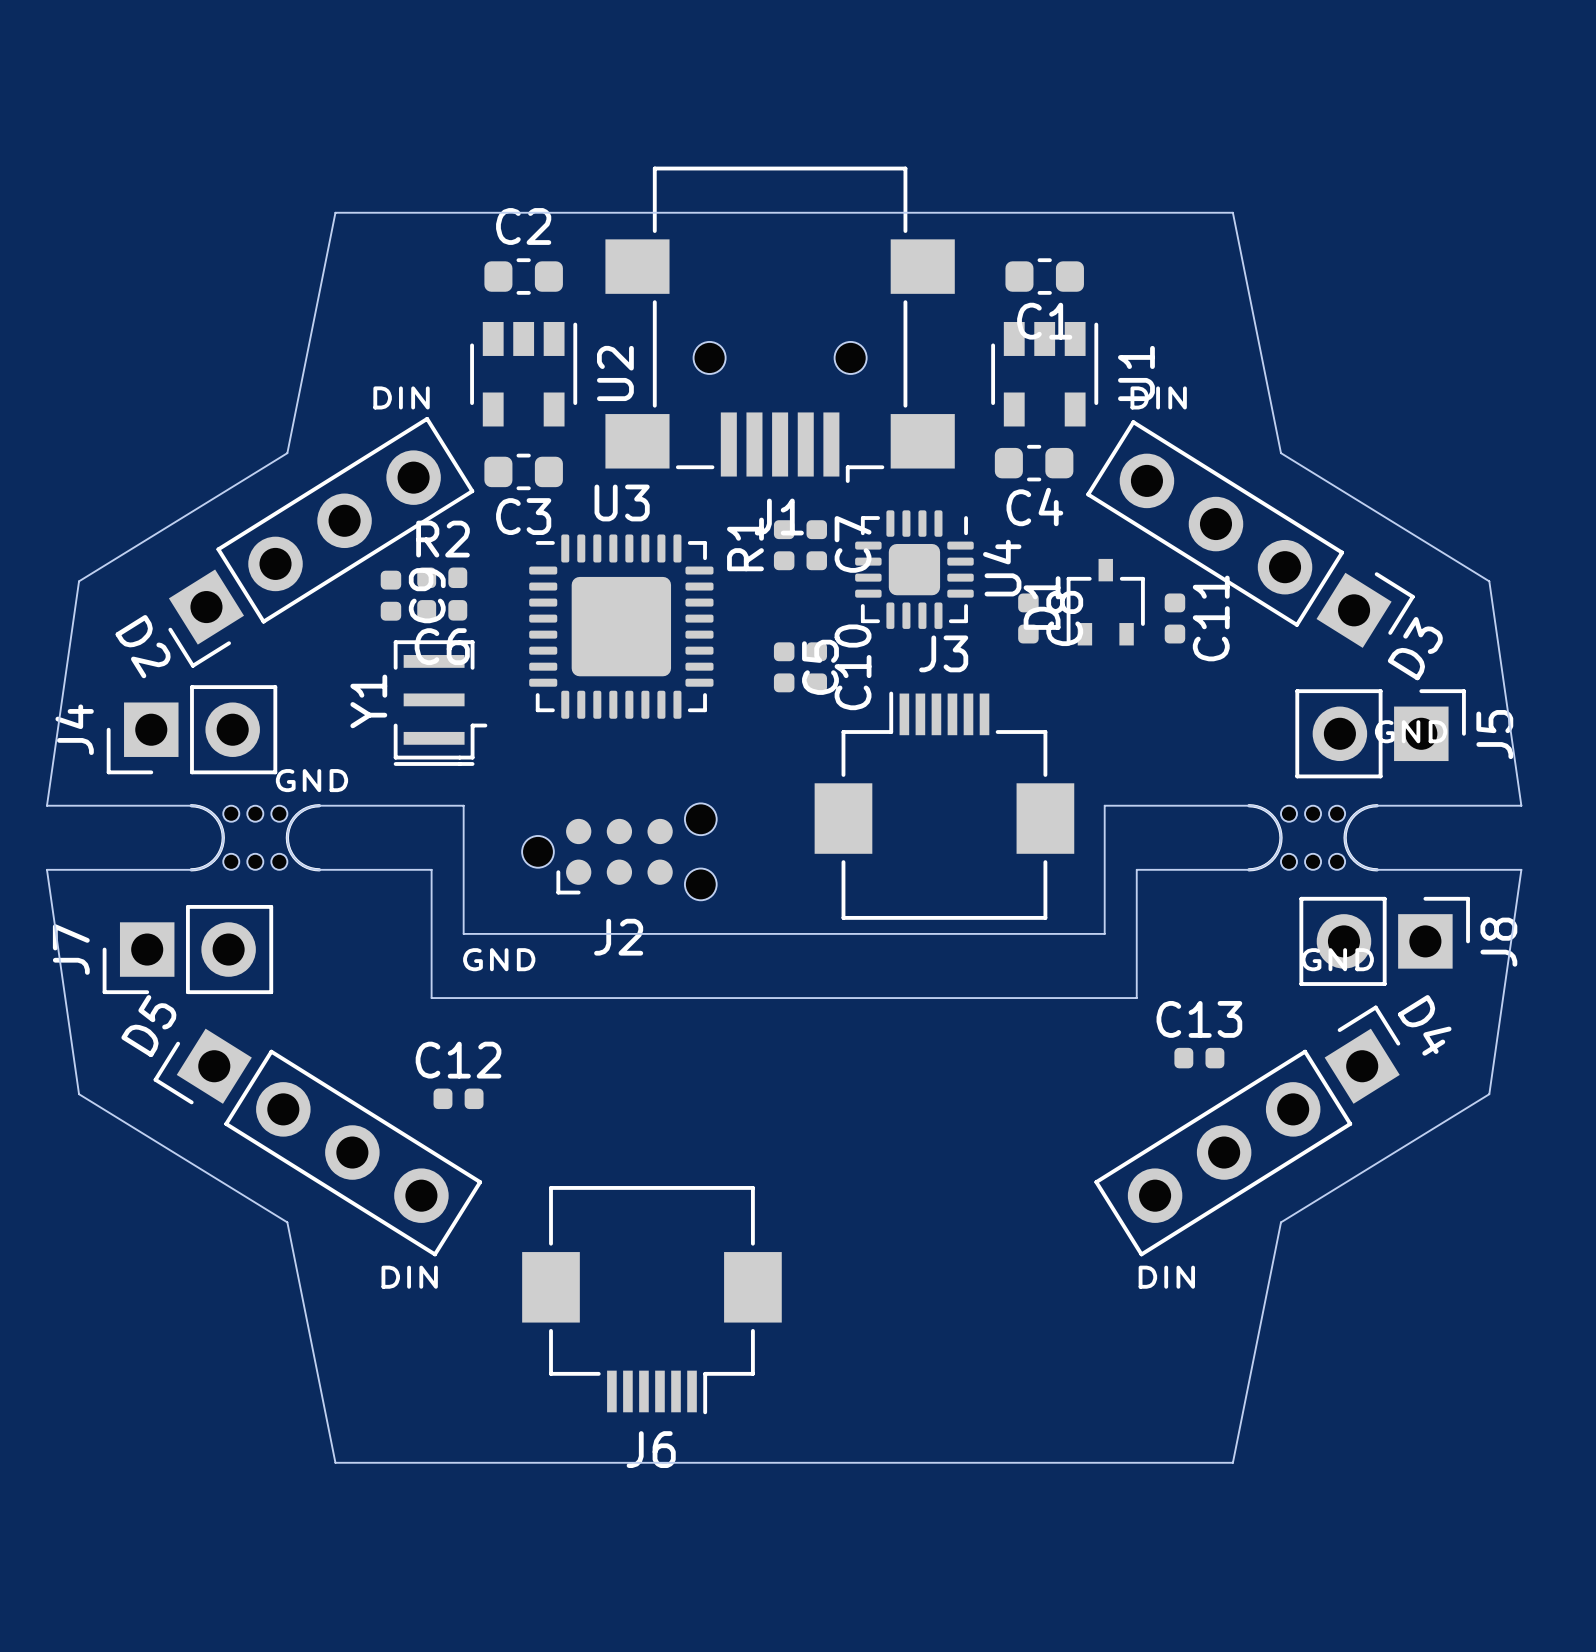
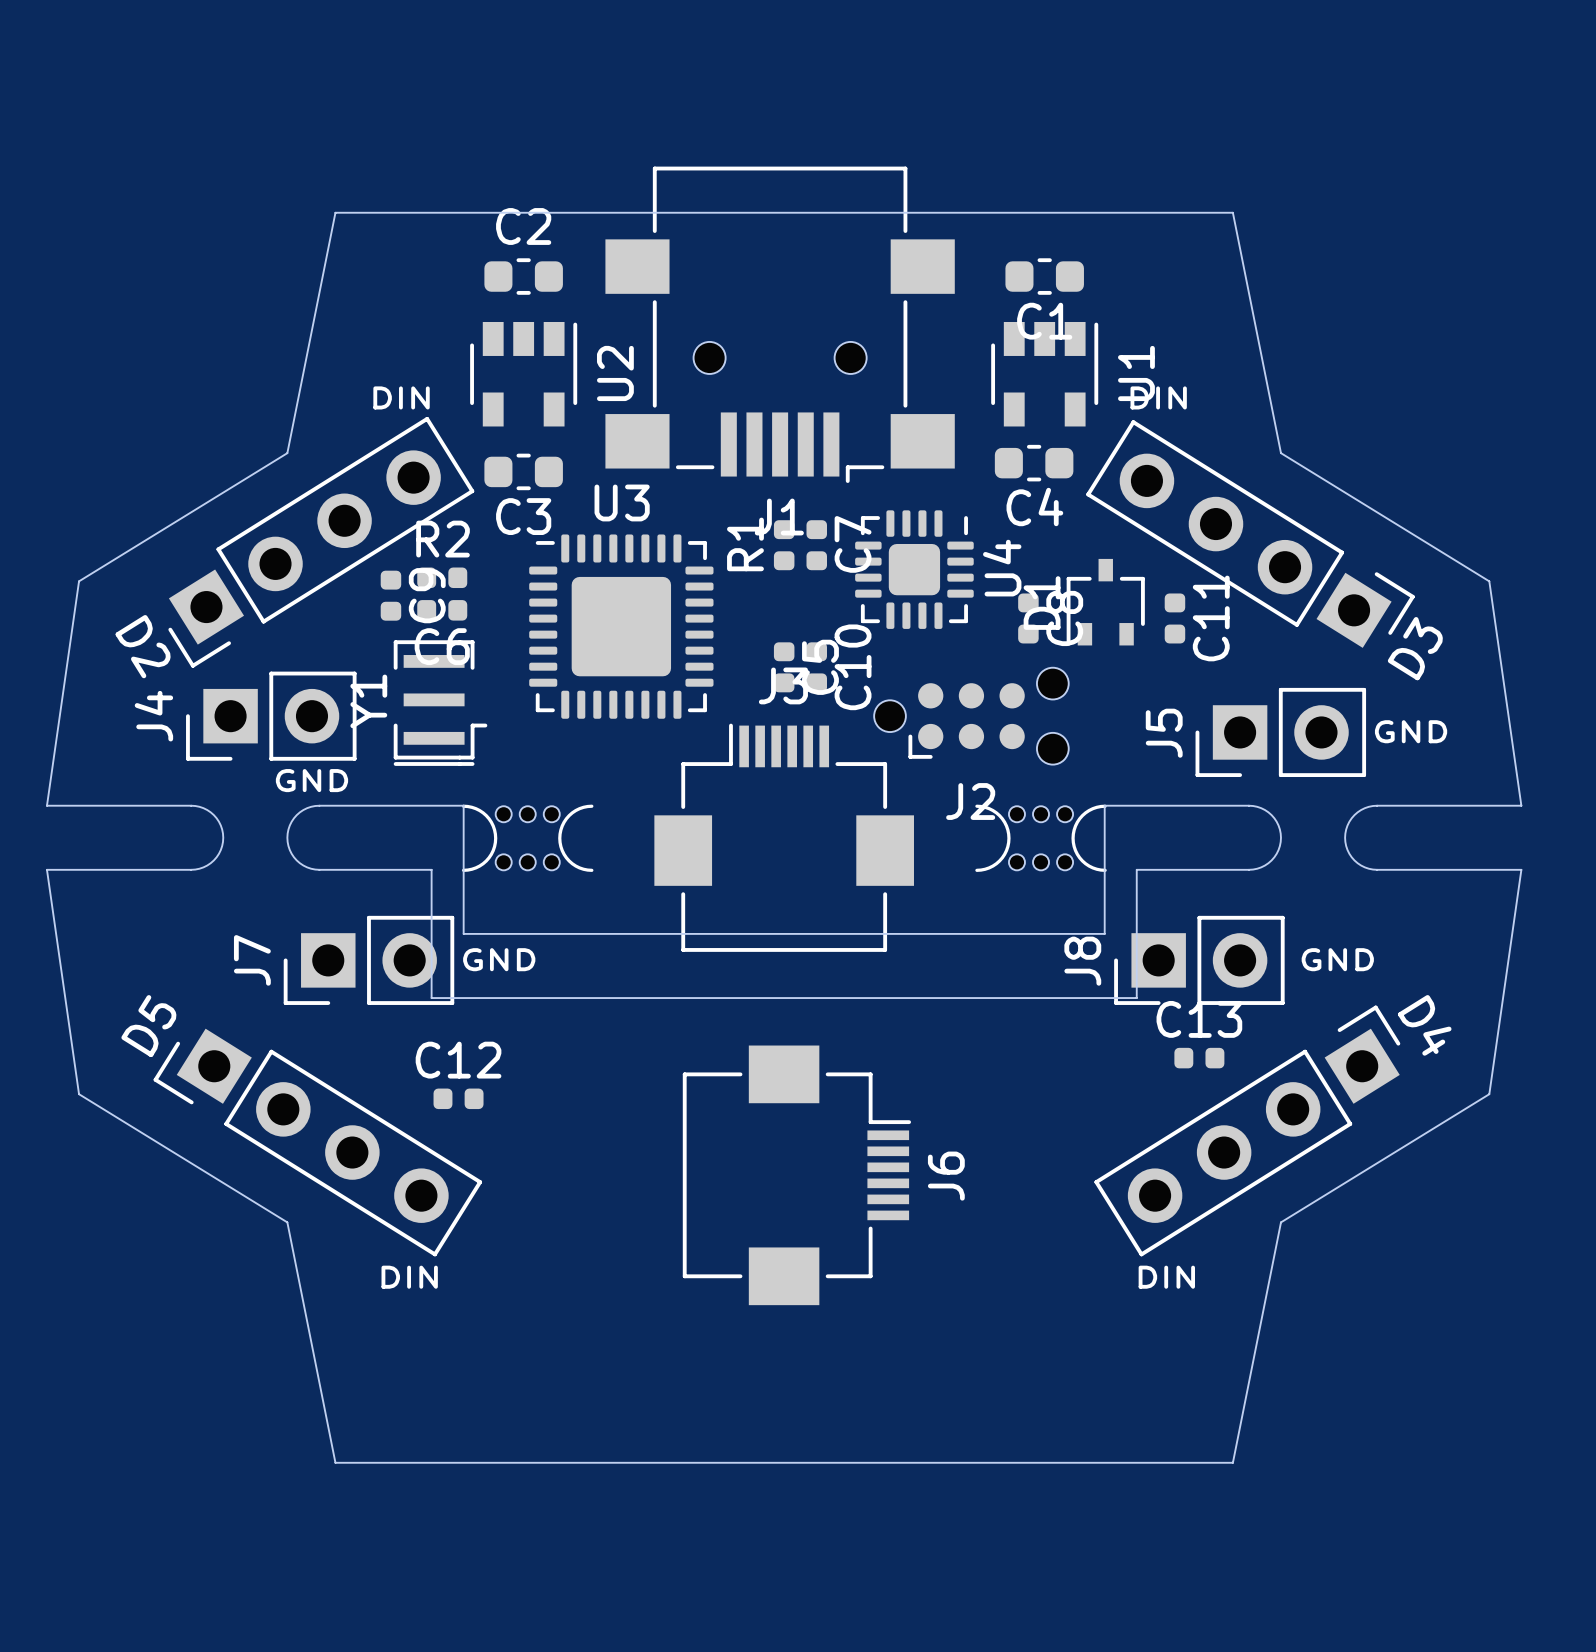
J4 position: (191, 729) -> (271, 716)
J5 rotation: 0° (1380, 733) -> 180° (1280, 732)
J3 position: (944, 805) -> (784, 837)
part position: (255, 837) -> (527, 838)
part position: (1313, 837) -> (1041, 838)
J2 position: (619, 851) -> (971, 716)
J8 rotation: 0° (1384, 941) -> 180° (1199, 960)
J8 position: (1384, 941) -> (1199, 960)
J7 position: (187, 949) -> (368, 960)
J6 rotation: 0° (651, 1300) -> 90° counterclockwise (796, 1175)
J6 position: (651, 1300) -> (796, 1175)

